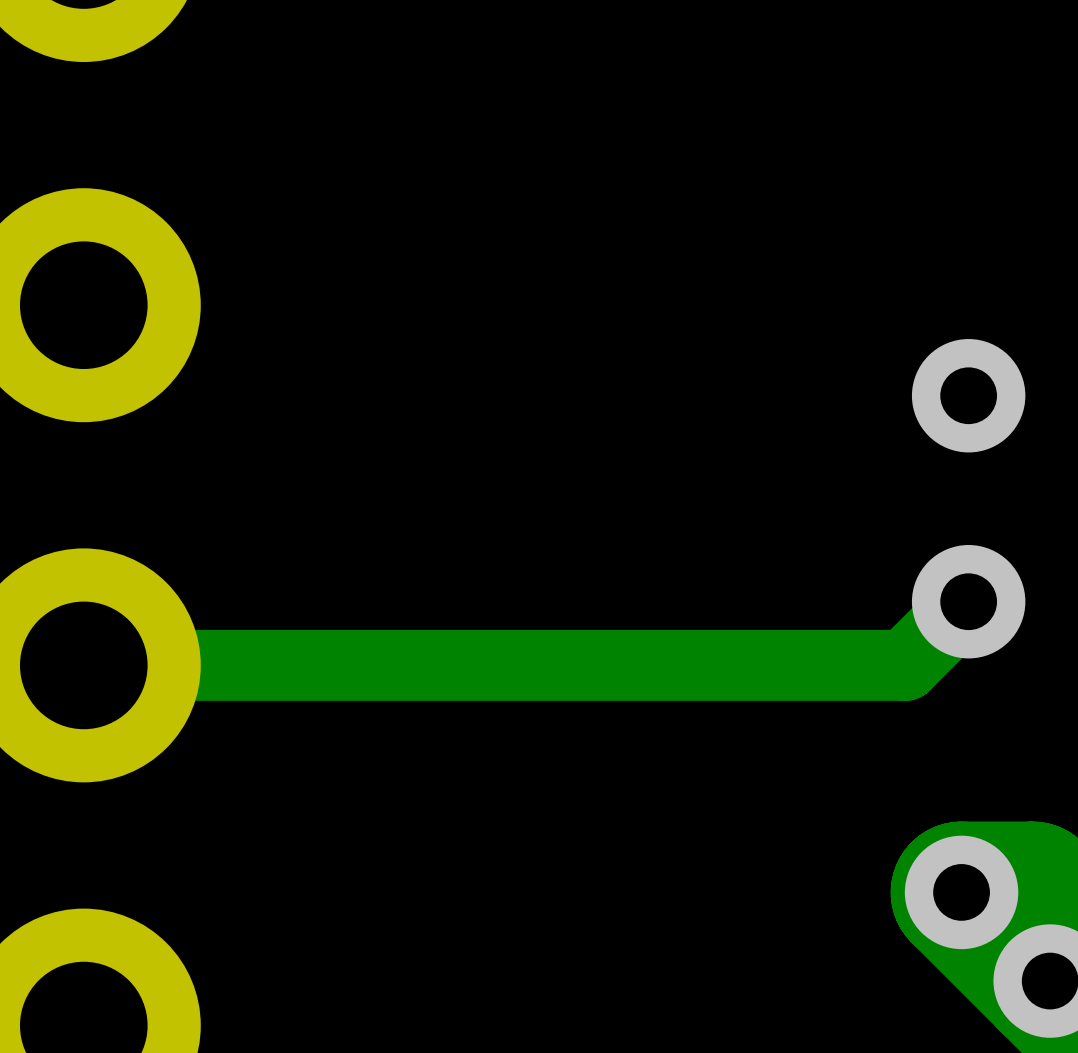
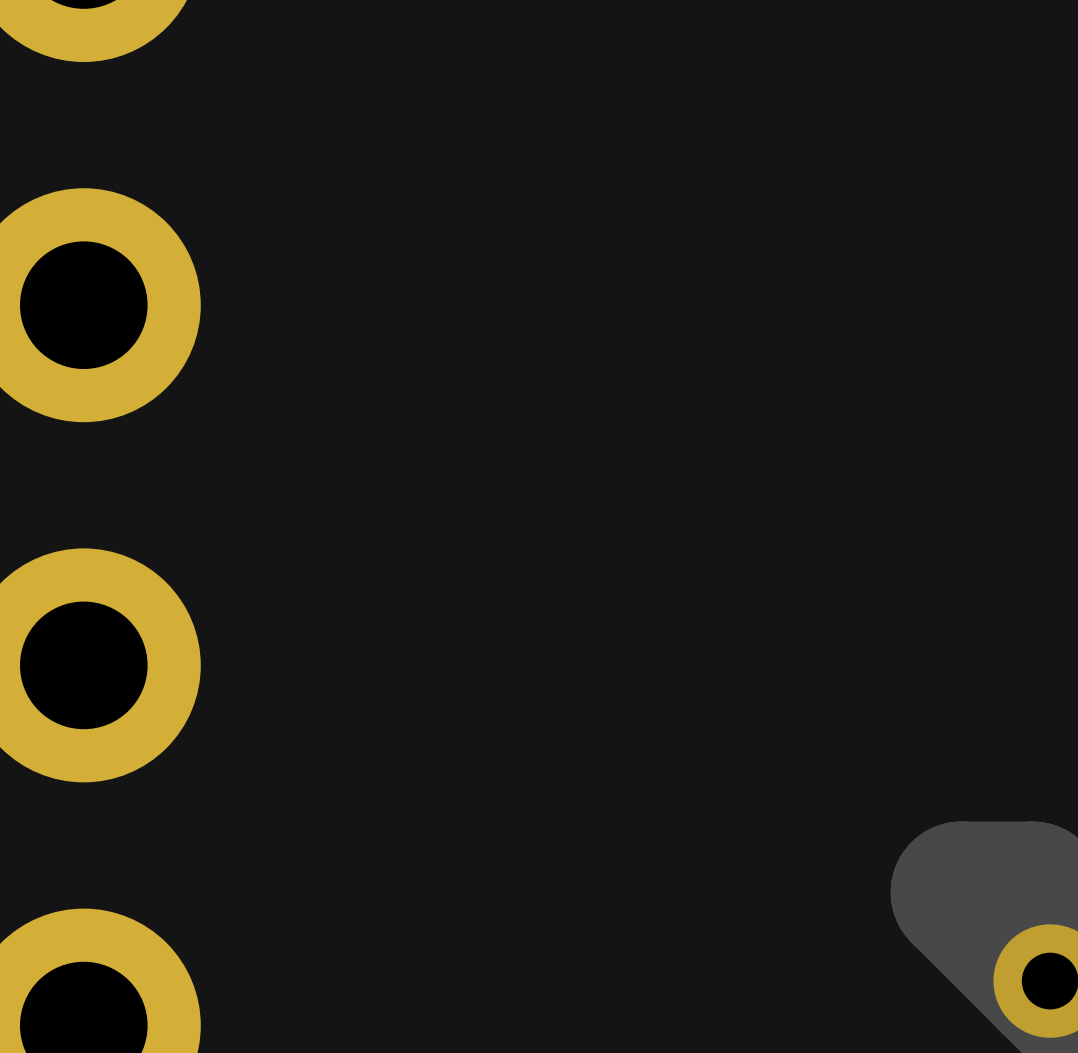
via: (968, 395) -> none
track: (968, 601) (904, 665) (83, 665) -> none
via: (968, 601) -> none
via: (961, 892) -> none

